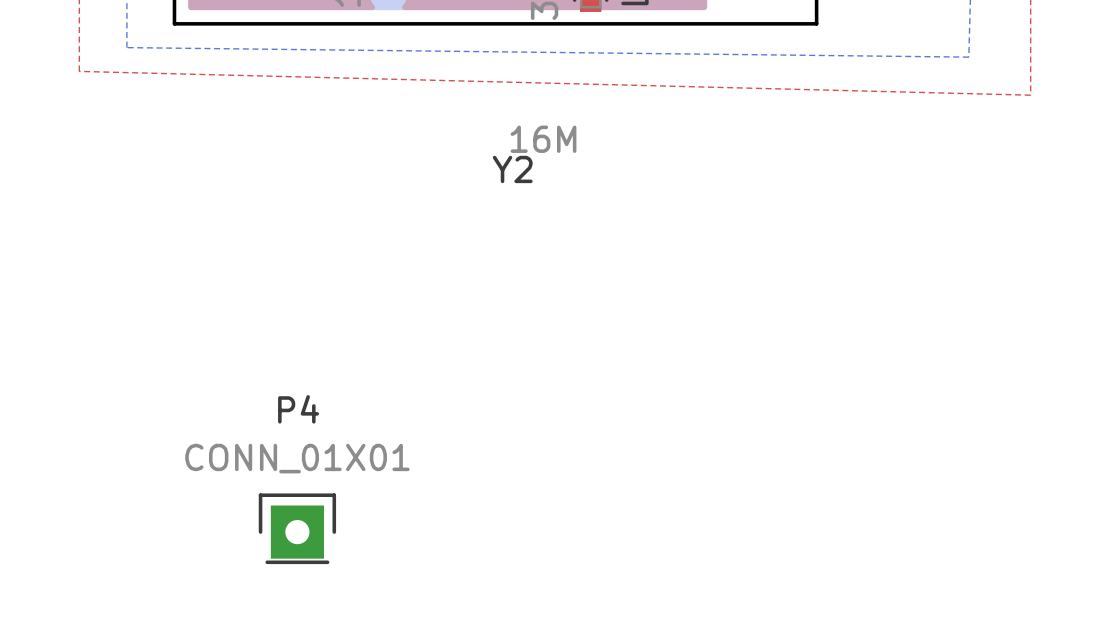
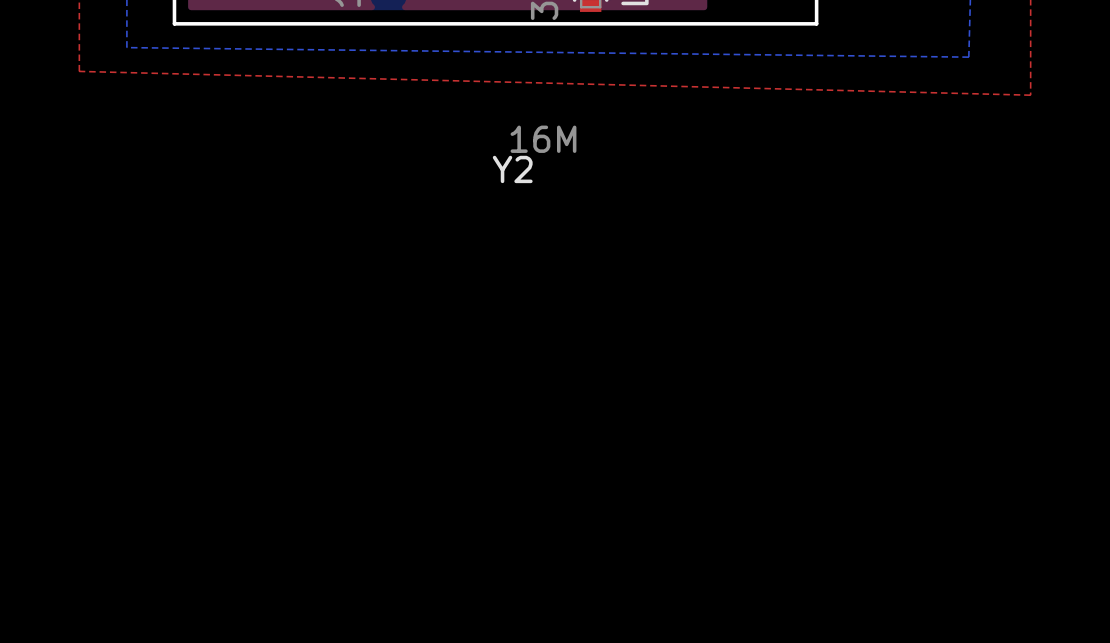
P4: CONN_01X01 (297, 528) -> none

